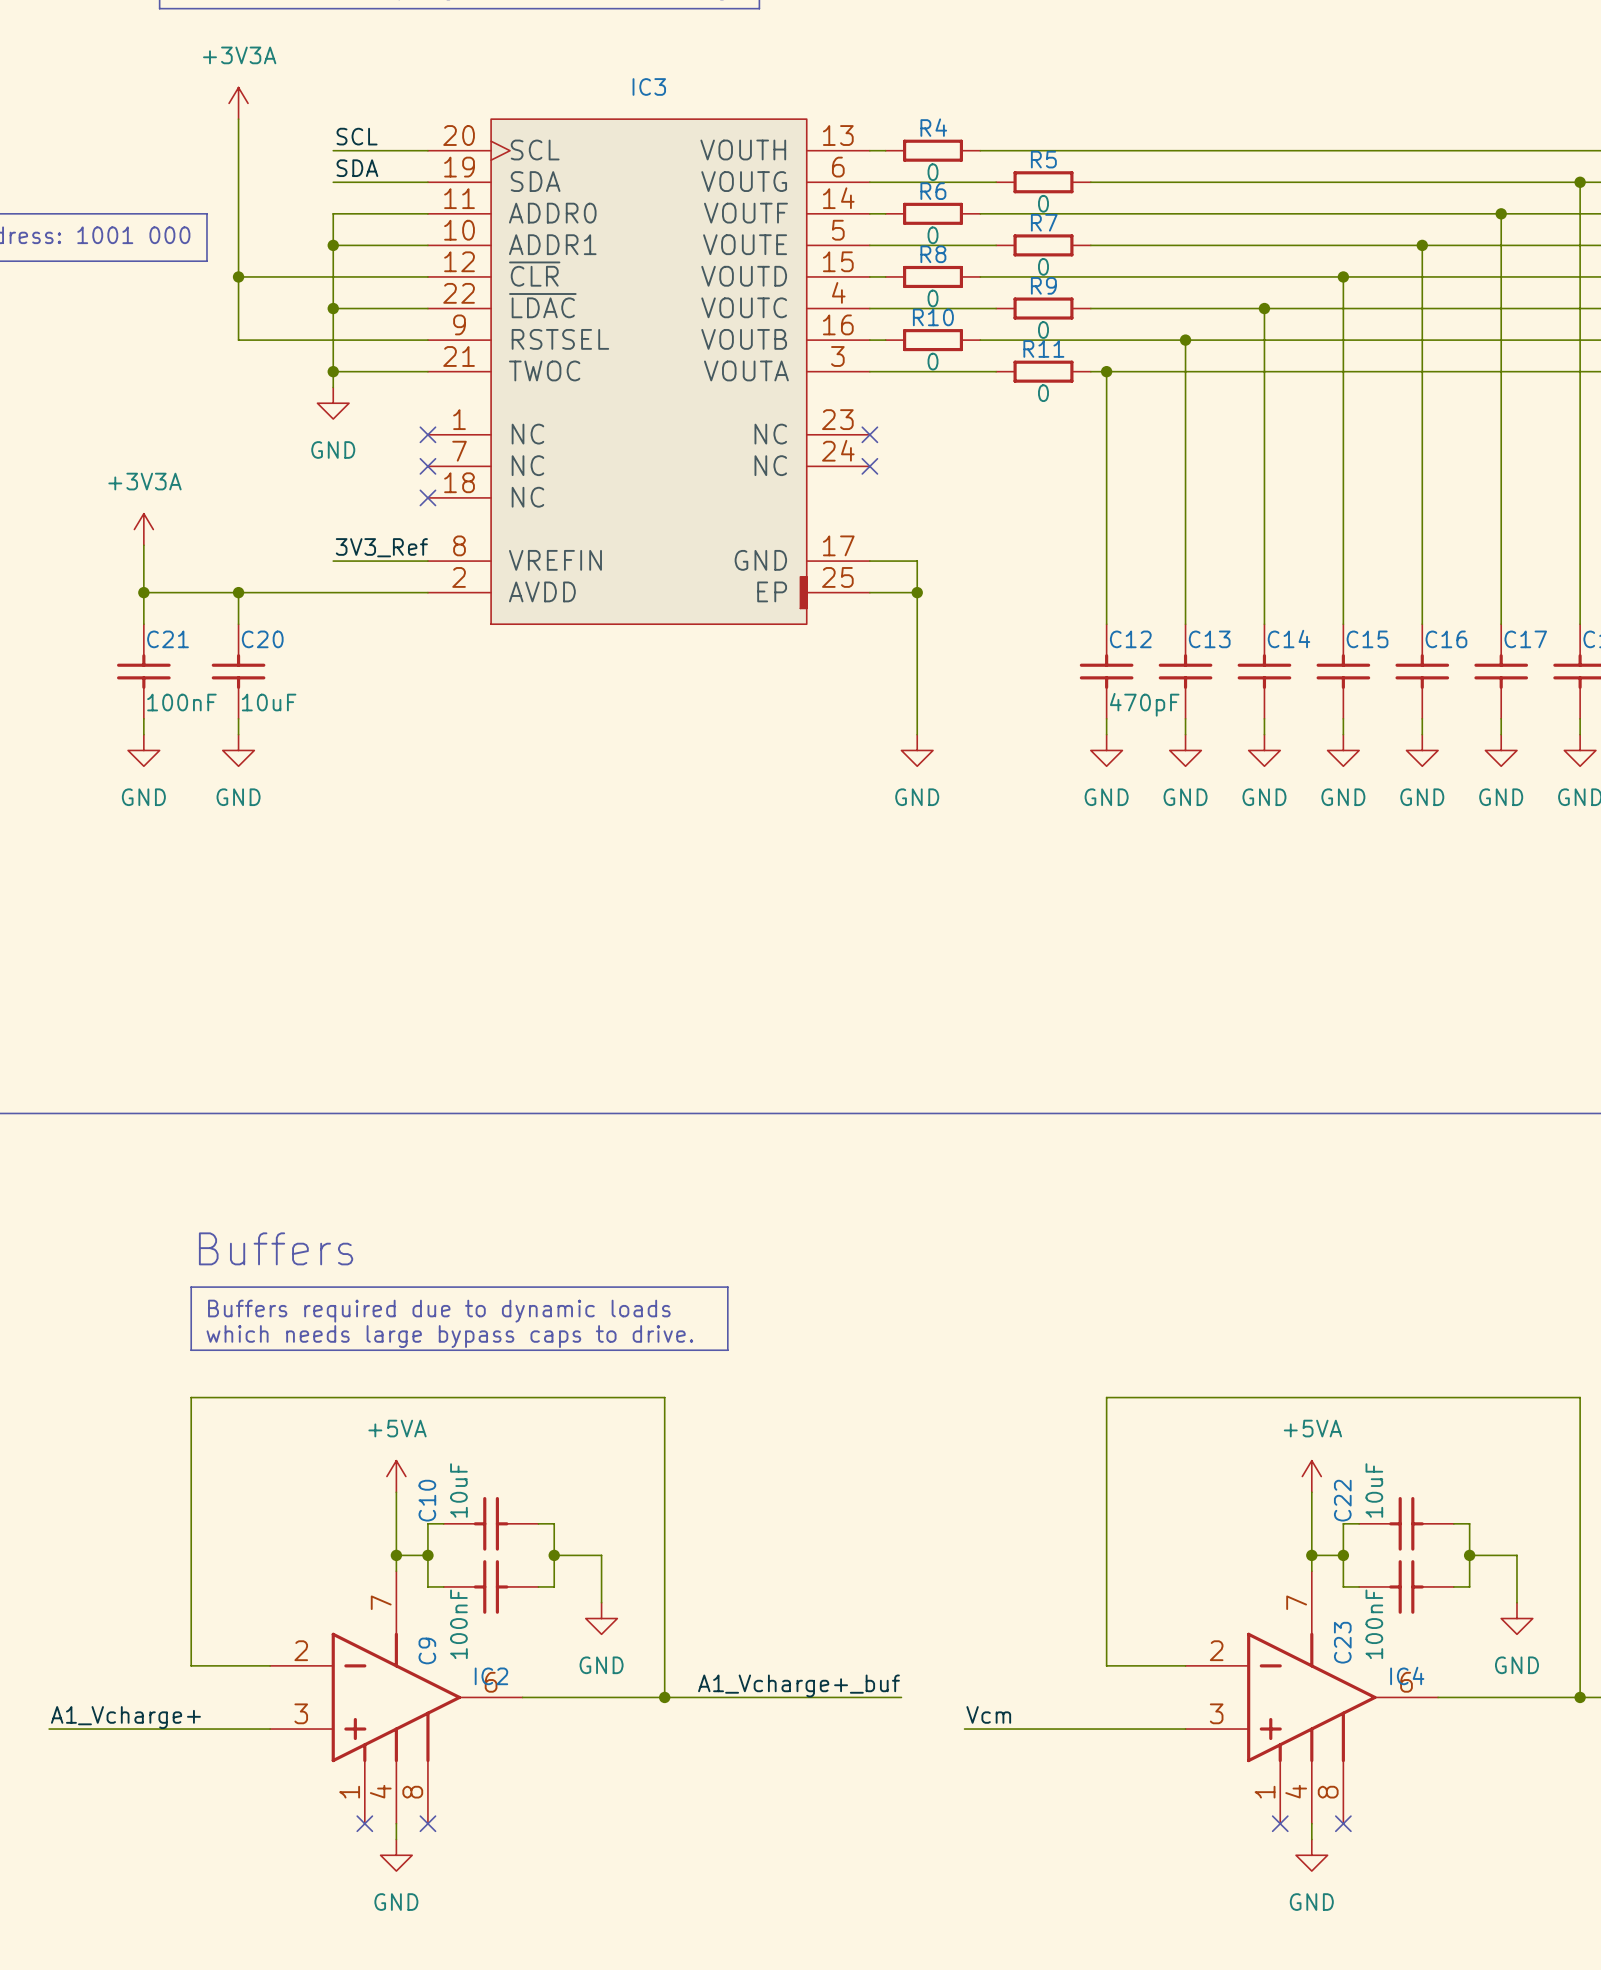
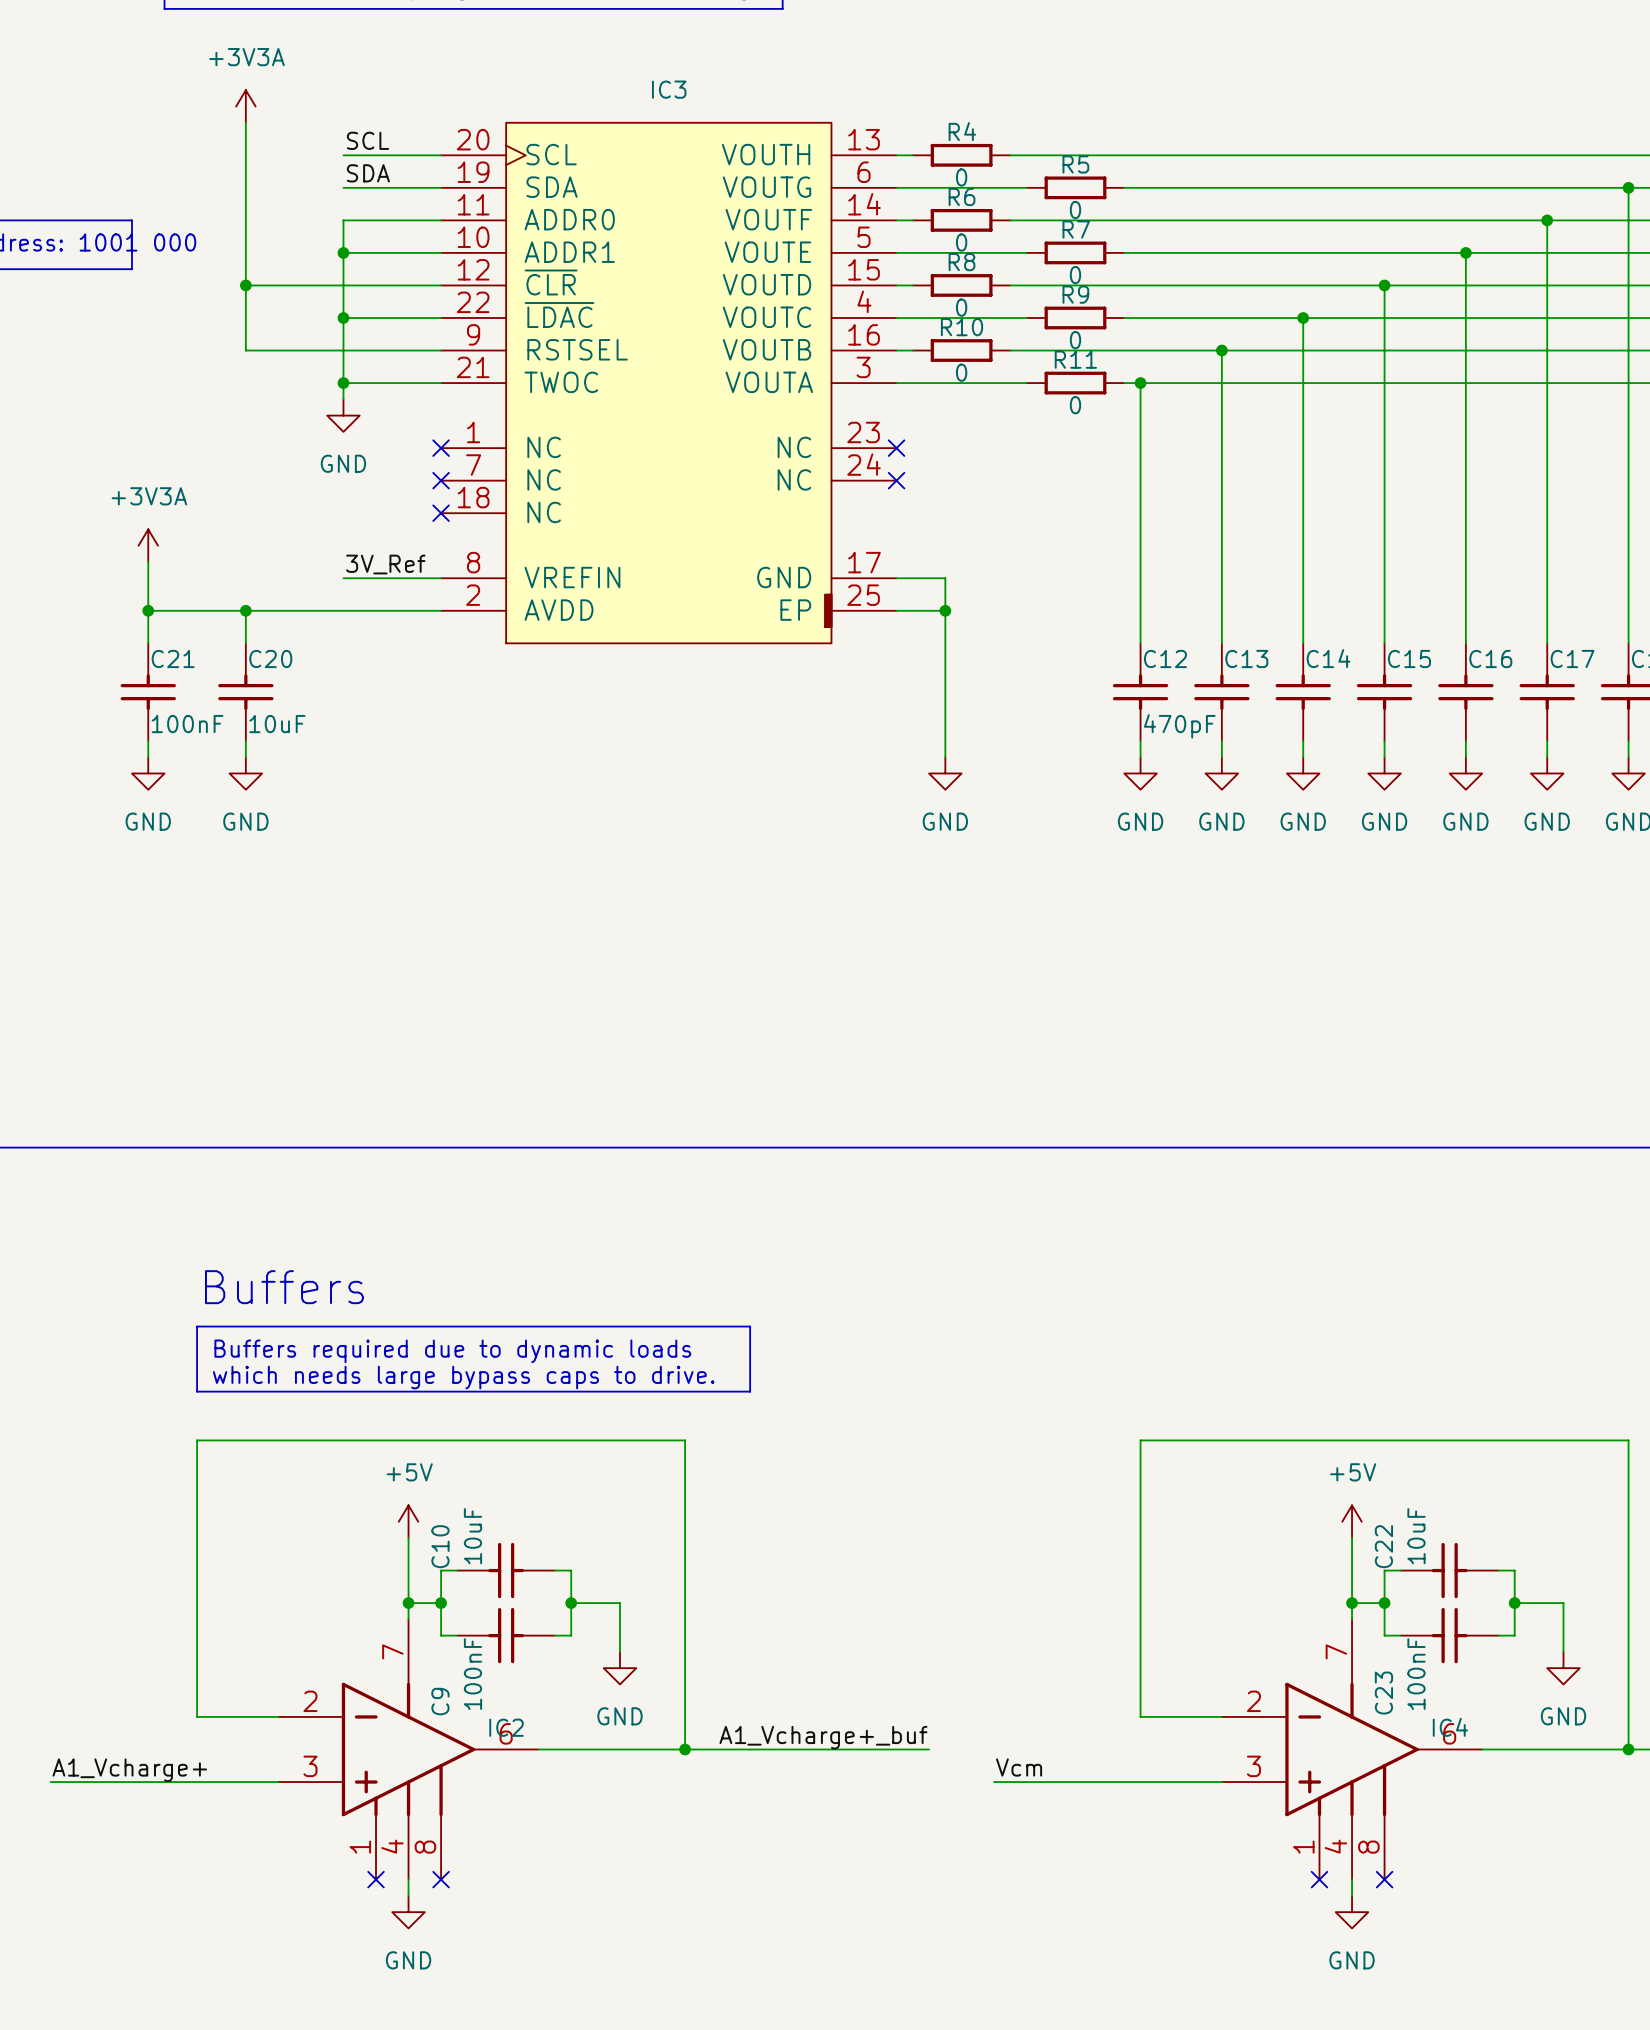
line: (128, 213) (206, 213) (206, 261) (128, 261) -> (131, 220) (131, 269)
label: 3V3_Ref (381, 547) -> 3V_Ref (385, 564)
power symbol: +5VA (396, 1476) -> +5V (408, 1521)
power symbol: +5VA (1311, 1476) -> +5V (1352, 1521)

